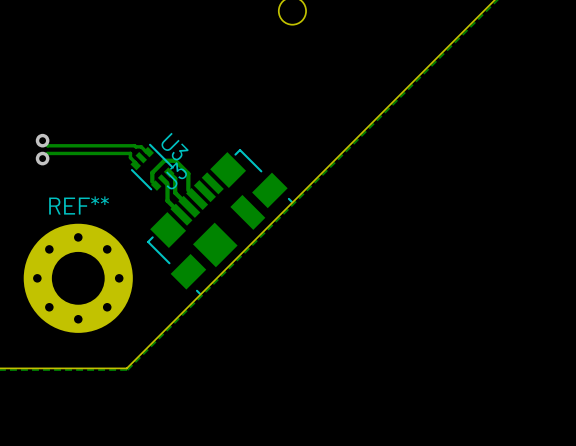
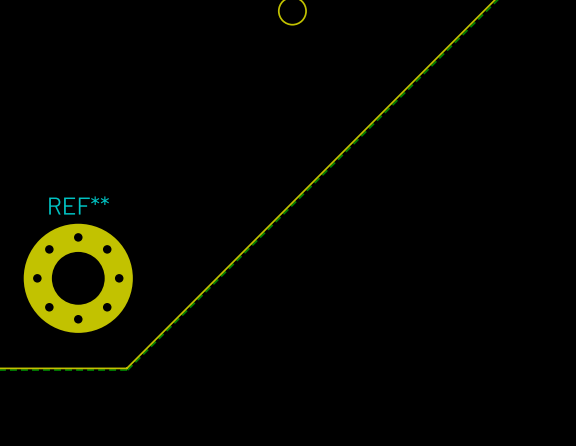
track: (42, 140) (47, 145) (134, 145) (141, 146) (148, 152) -> none
via: (42, 140) -> none
track: (130, 153) (47, 153) (42, 158) -> none
track: (130, 153) (130, 157) (135, 165) -> none
via: (42, 158) -> none
U3: (152, 167) -> none
track: (169, 172) (175, 178) (175, 192) (189, 206) -> none
track: (152, 181) (152, 172) (164, 160) (175, 160) (188, 173) (188, 190) -> none
track: (167, 183) (167, 200) (181, 214) -> none
J3: (220, 221) -> none

